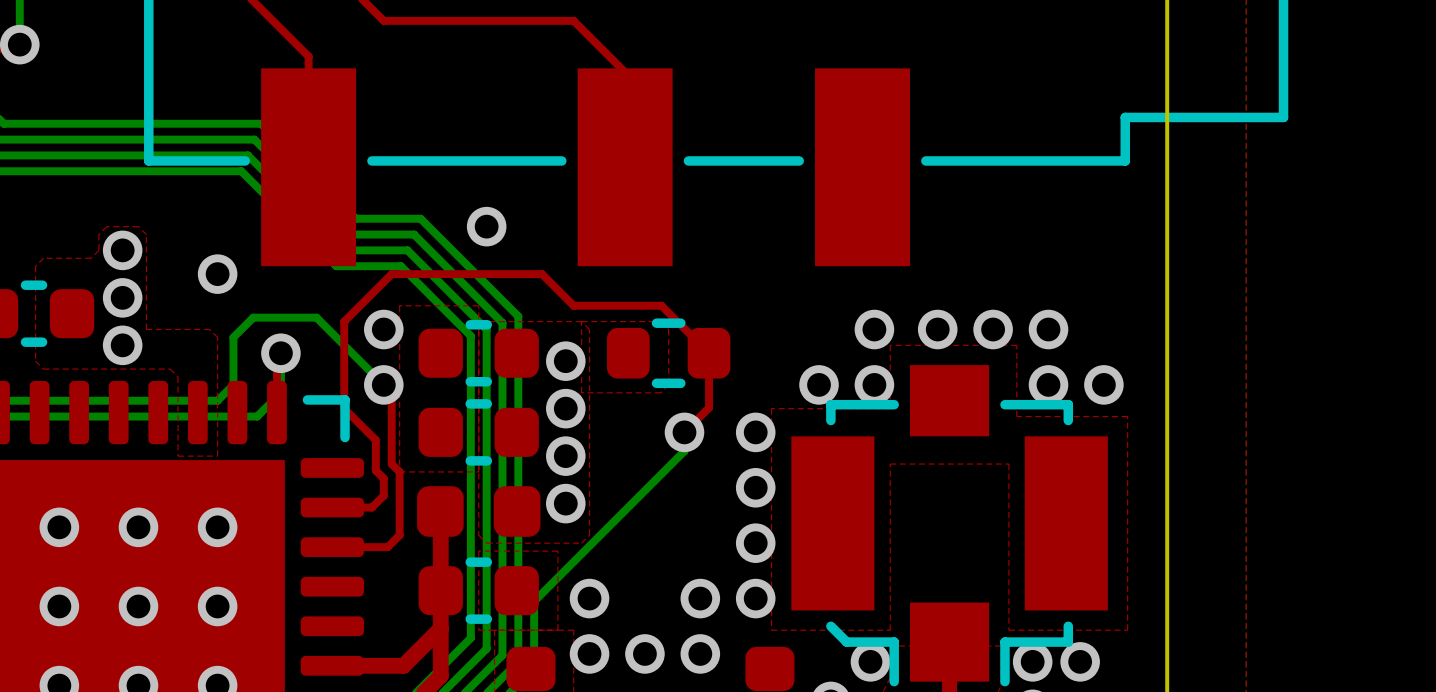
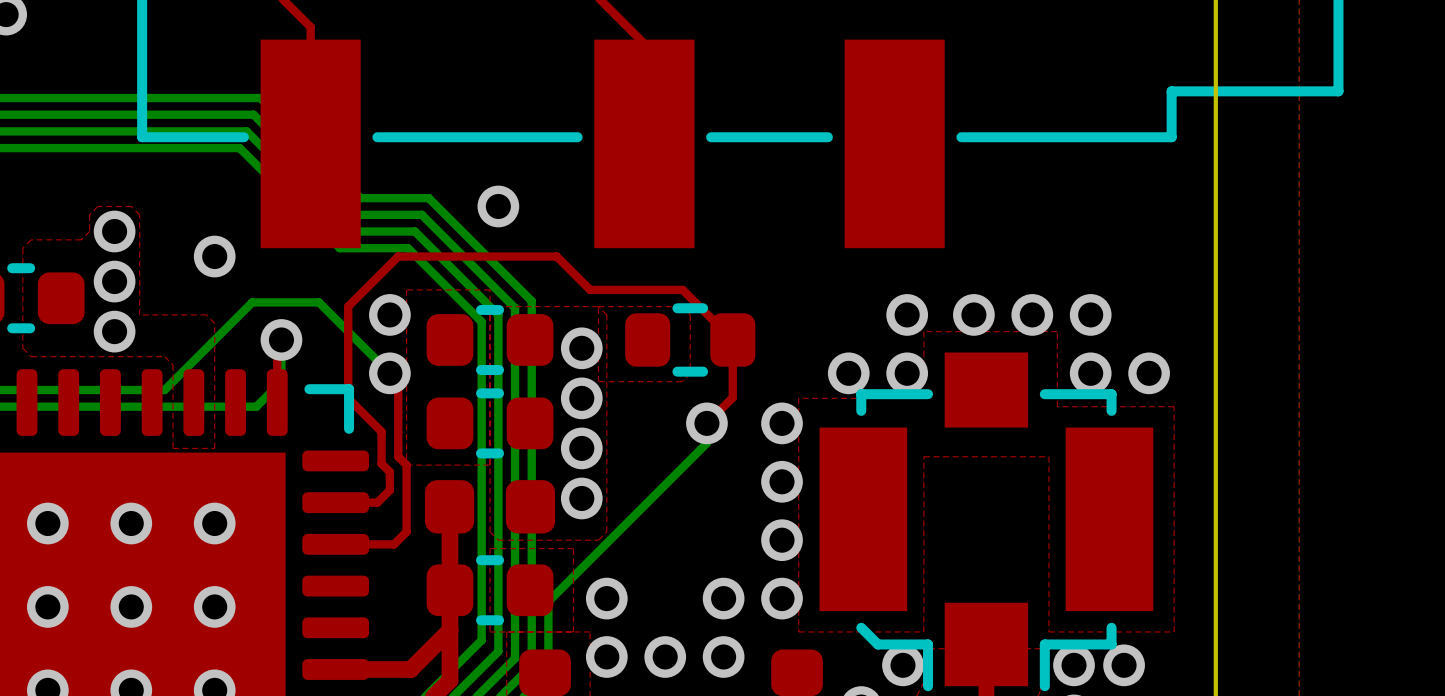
bottom track: (233, 337) (233, 384) (217, 400) (170, 400) -> (231, 323) (164, 390)

